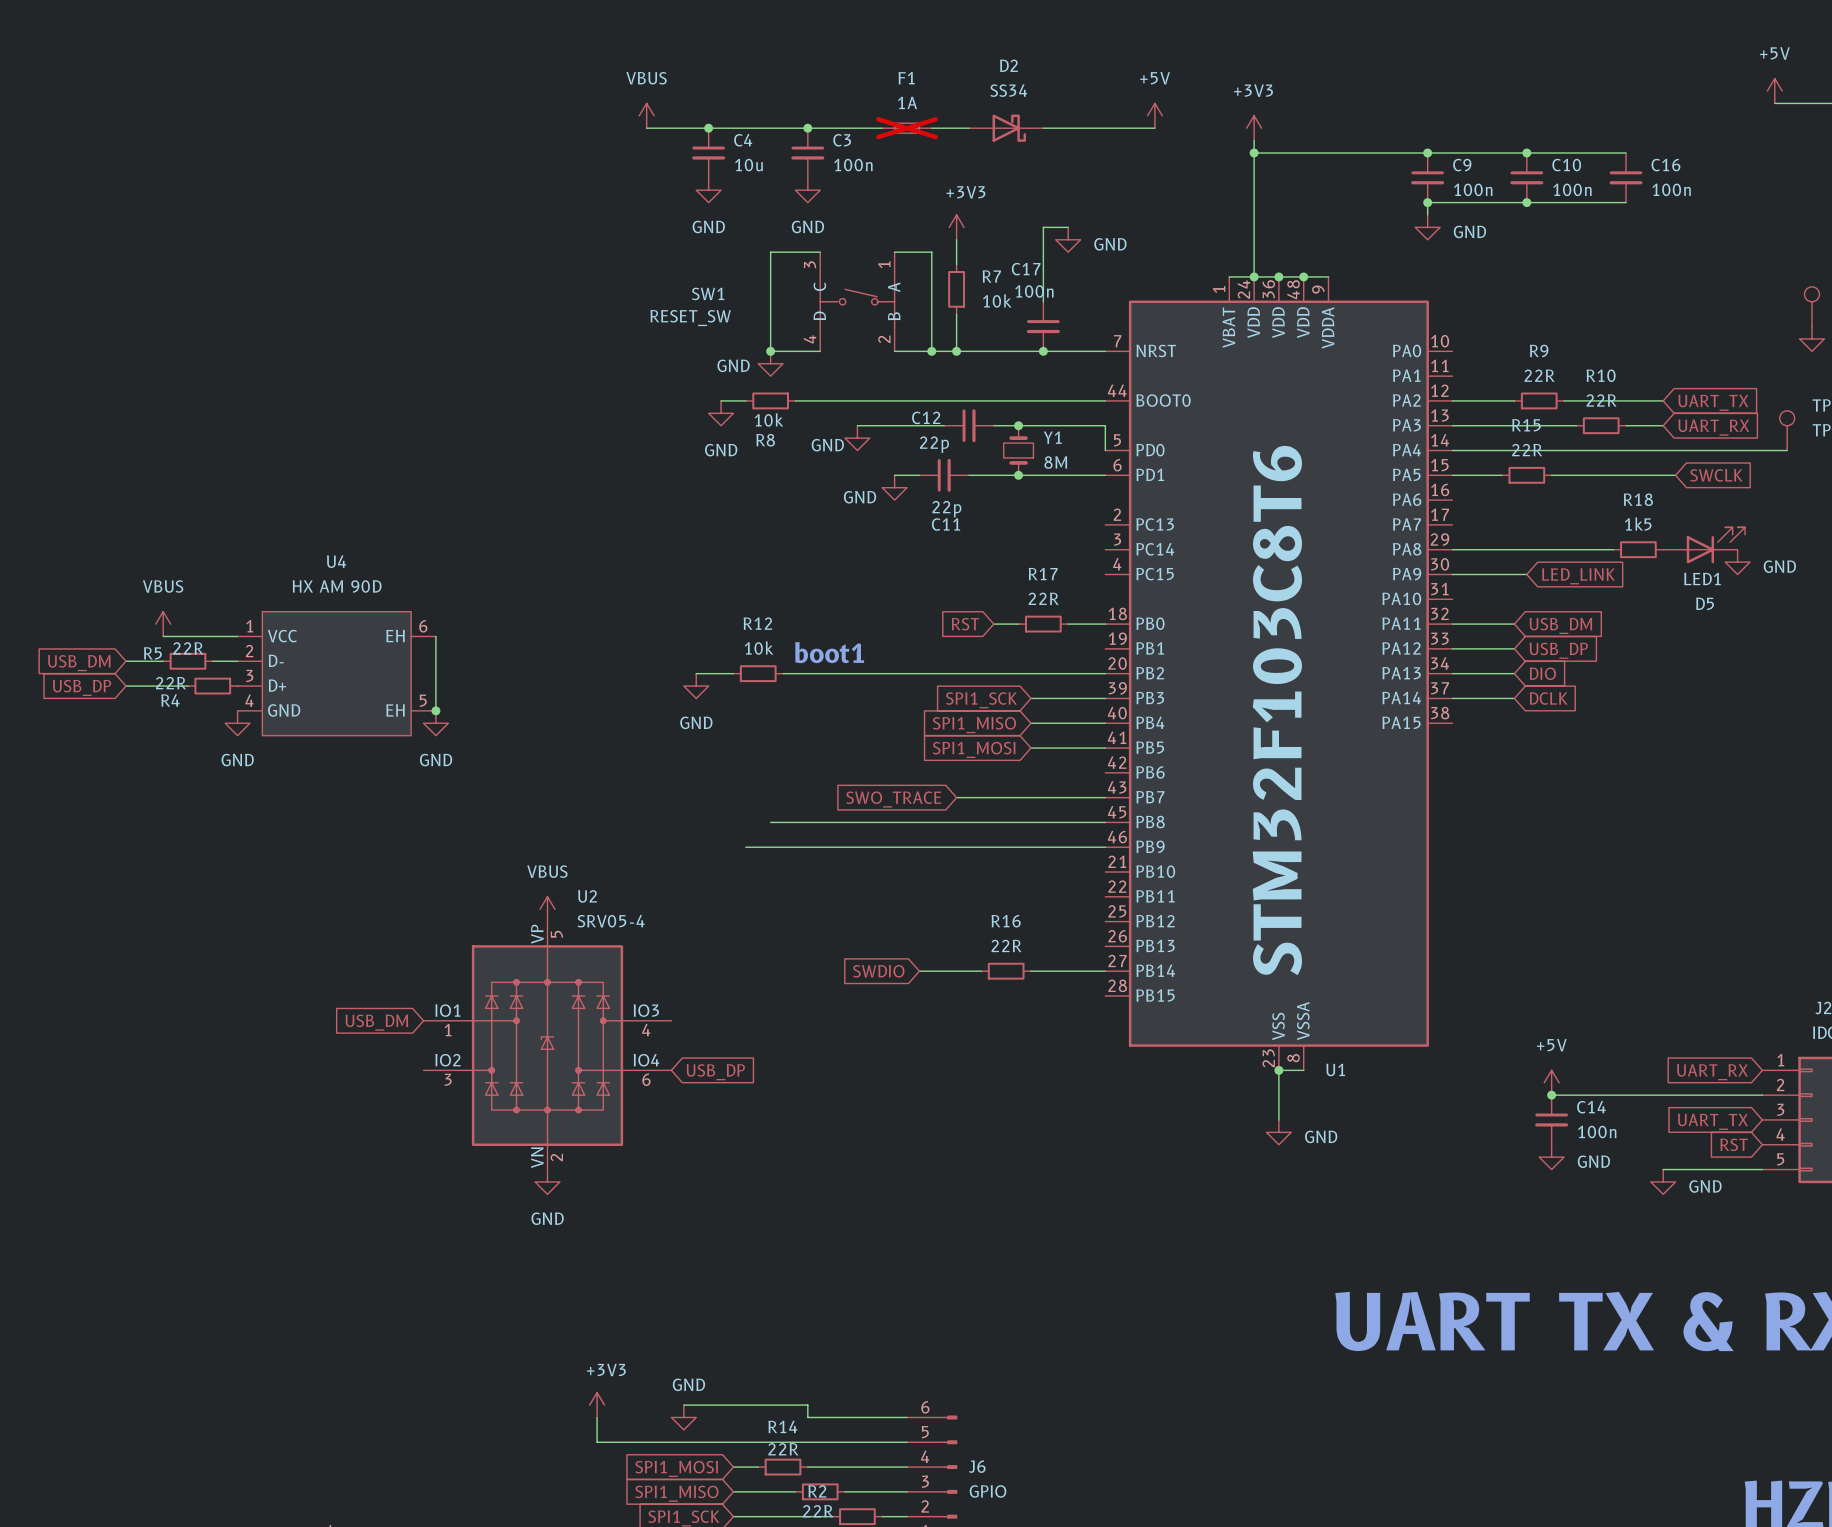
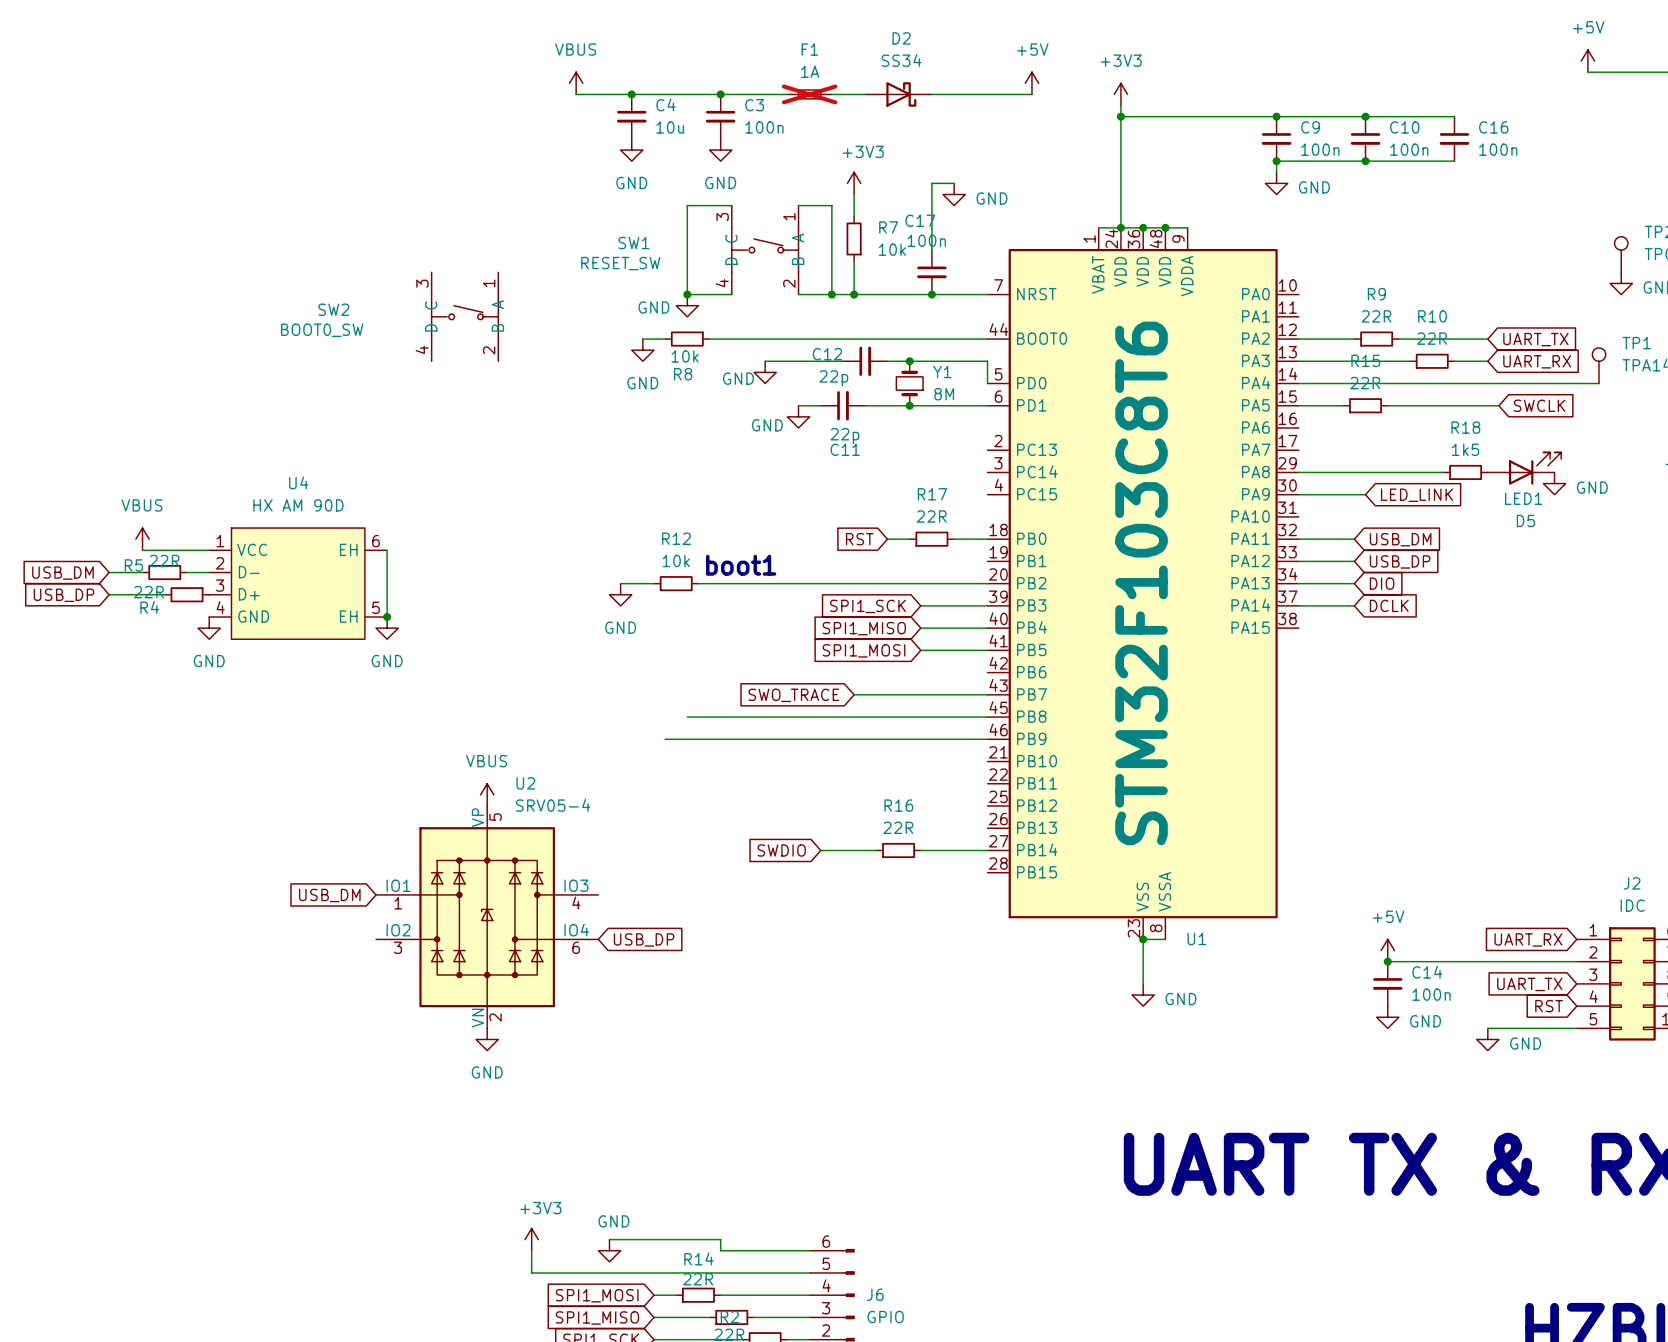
SW2: none -> BOOT0_SW (464, 316)

